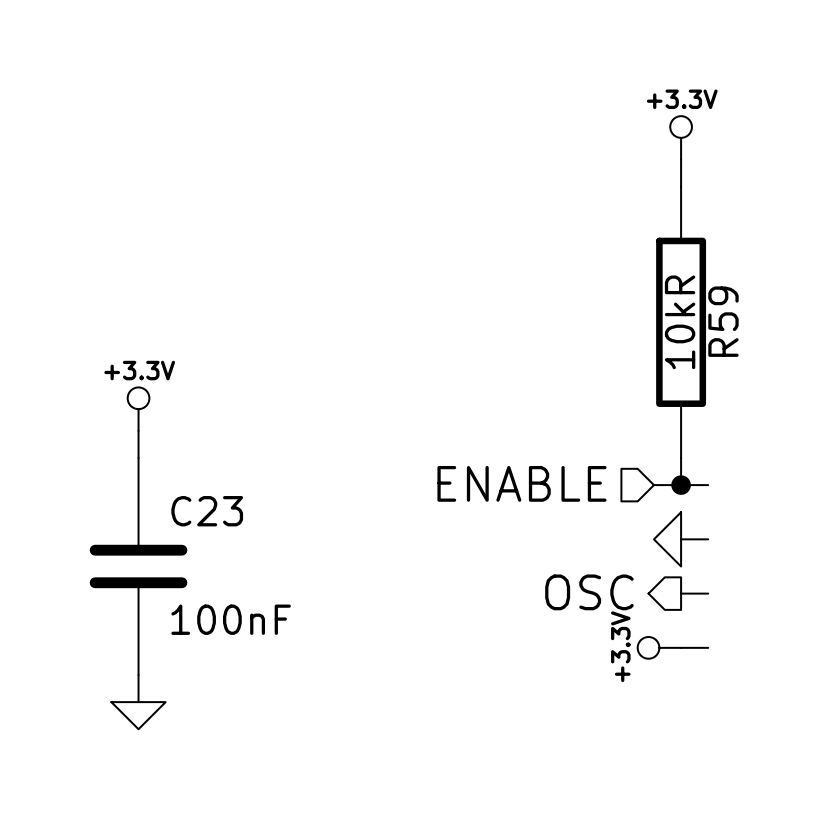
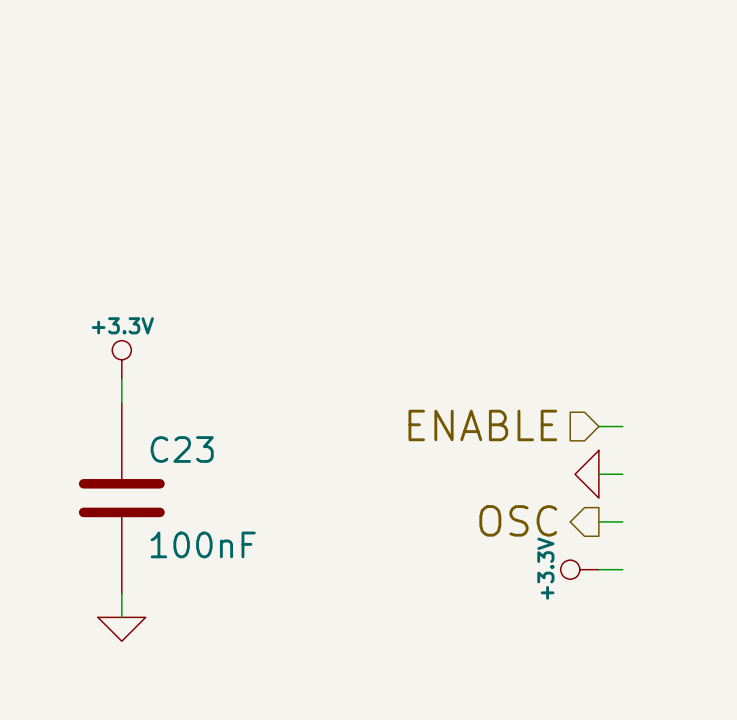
power symbol: +3.3V (681, 137) -> none
wire: (681, 159) (681, 186) -> none
R59: 10kR (681, 322) -> none
wire: (681, 457) (681, 485) (653, 485) -> none
hierarchical label position: ENABLE (521, 483) -> ENABLE (482, 425)
junction: (681, 485) -> none

